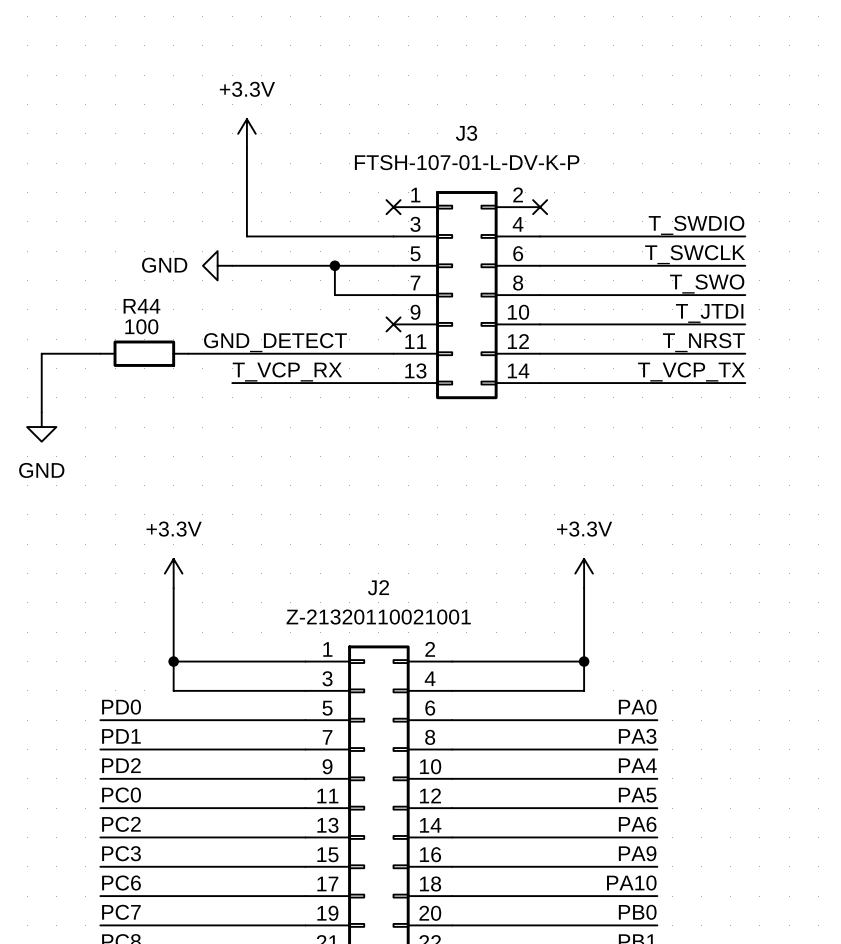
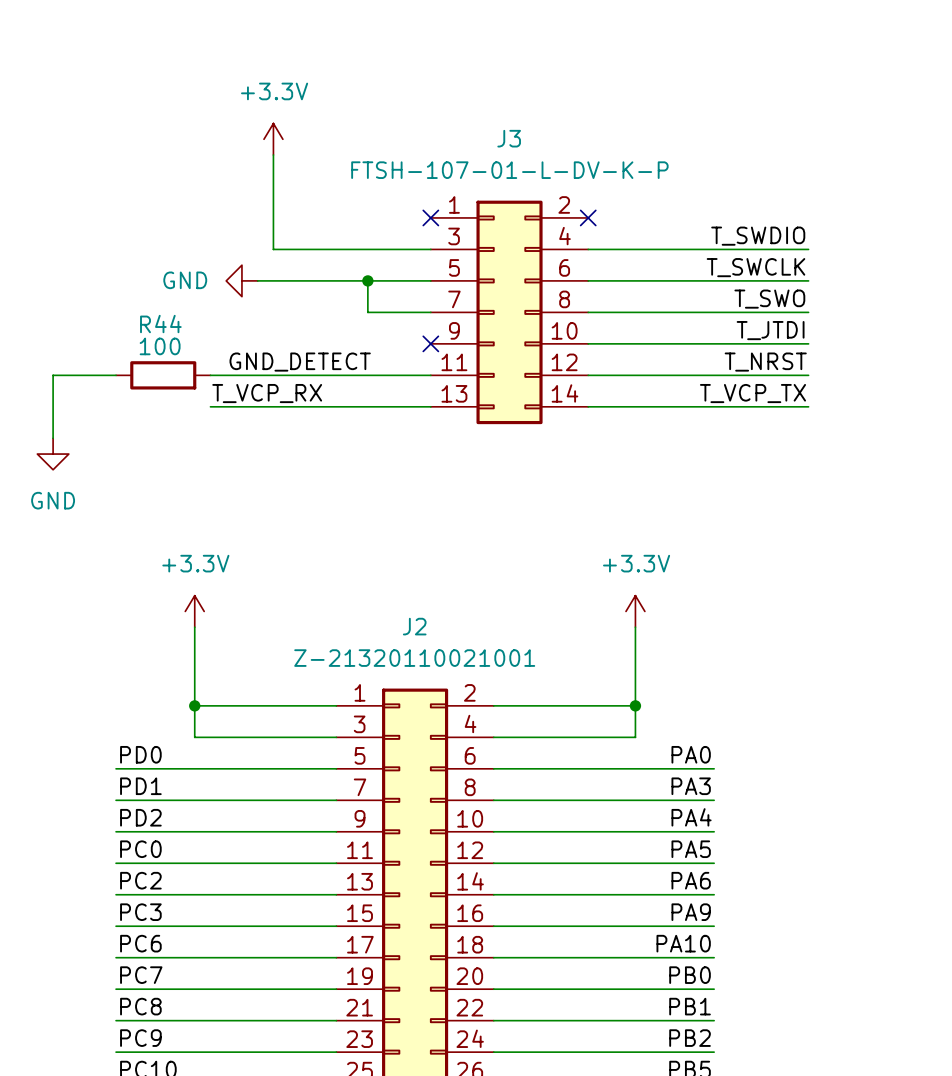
label position: T_VCP_RX (287, 371) -> T_VCP_RX (267, 393)
wire: none -> (210, 406) (257, 406)

